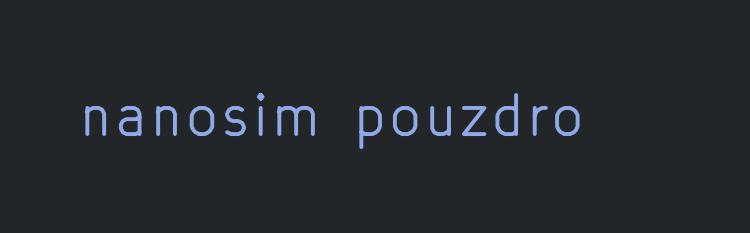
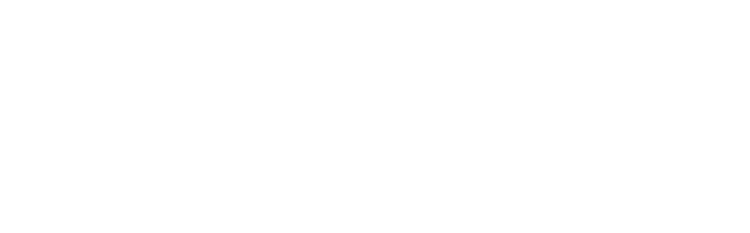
text: nanosim pouzdro (332, 121) -> none

